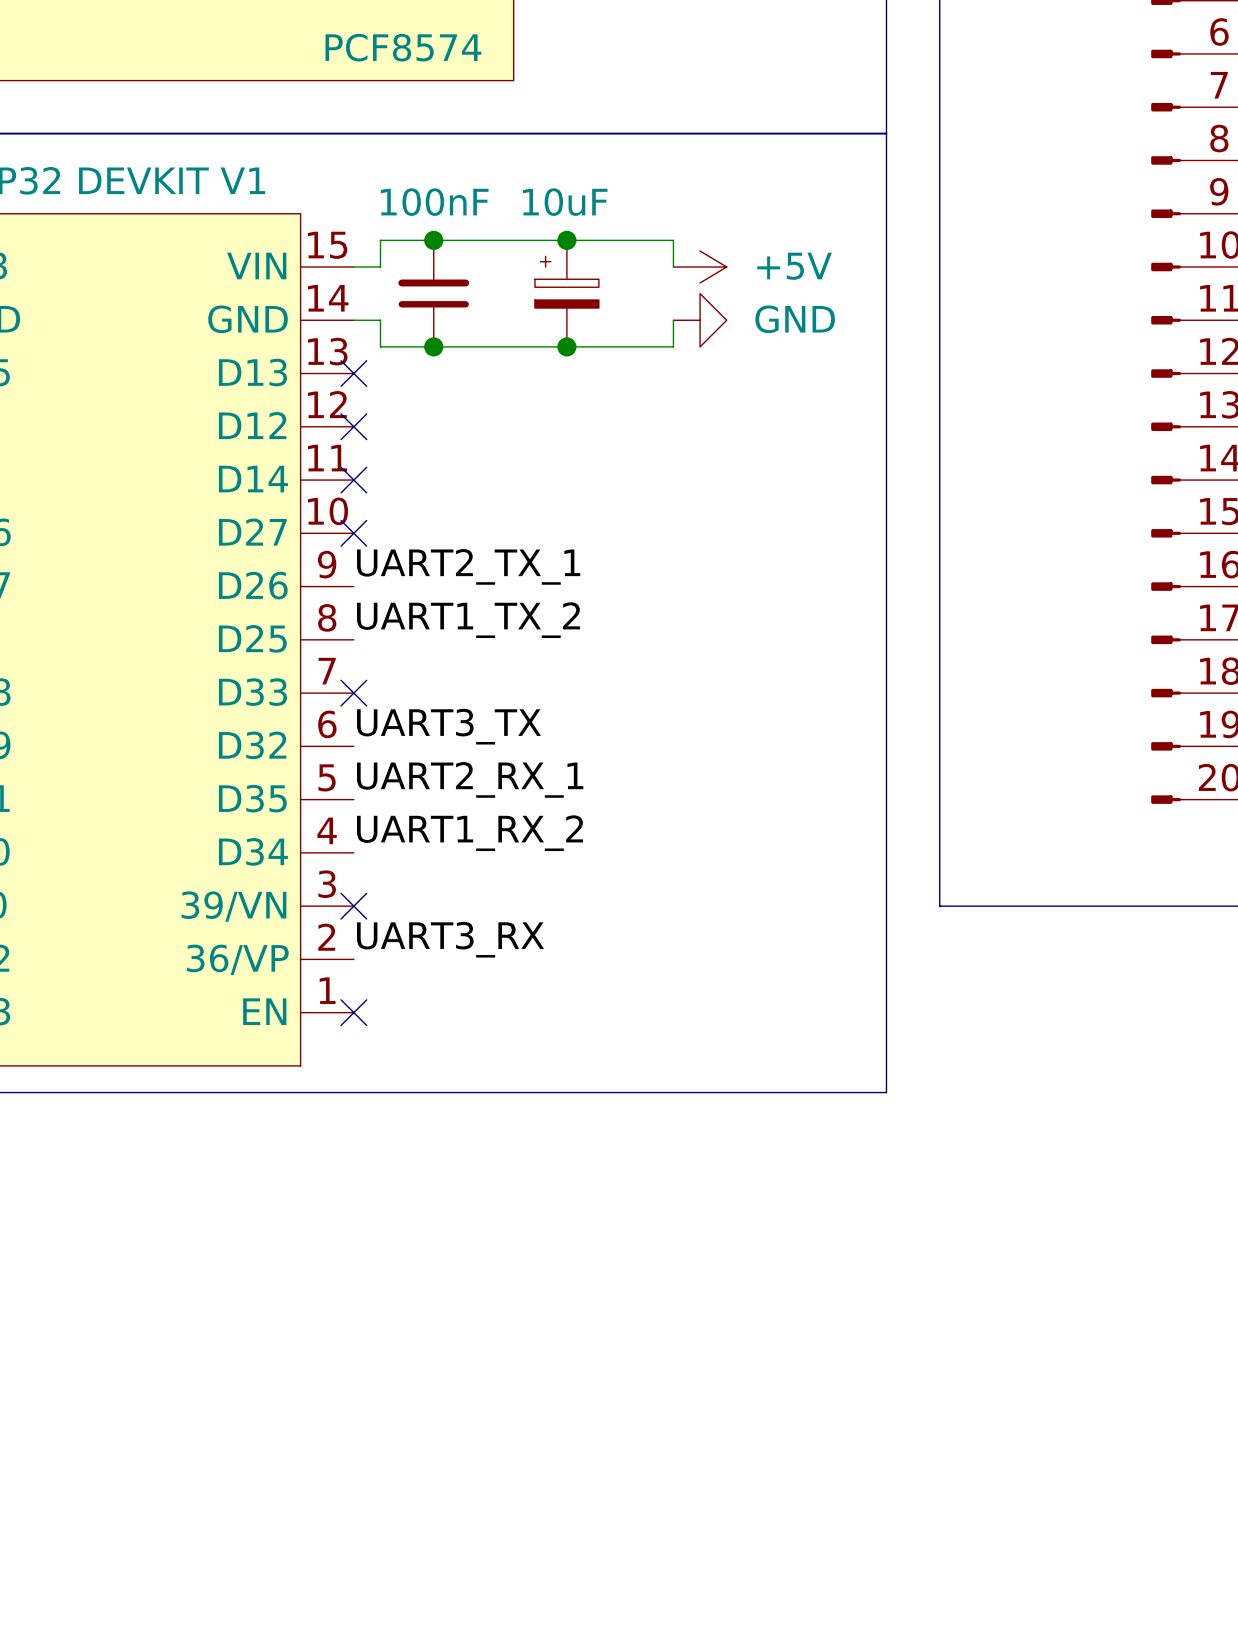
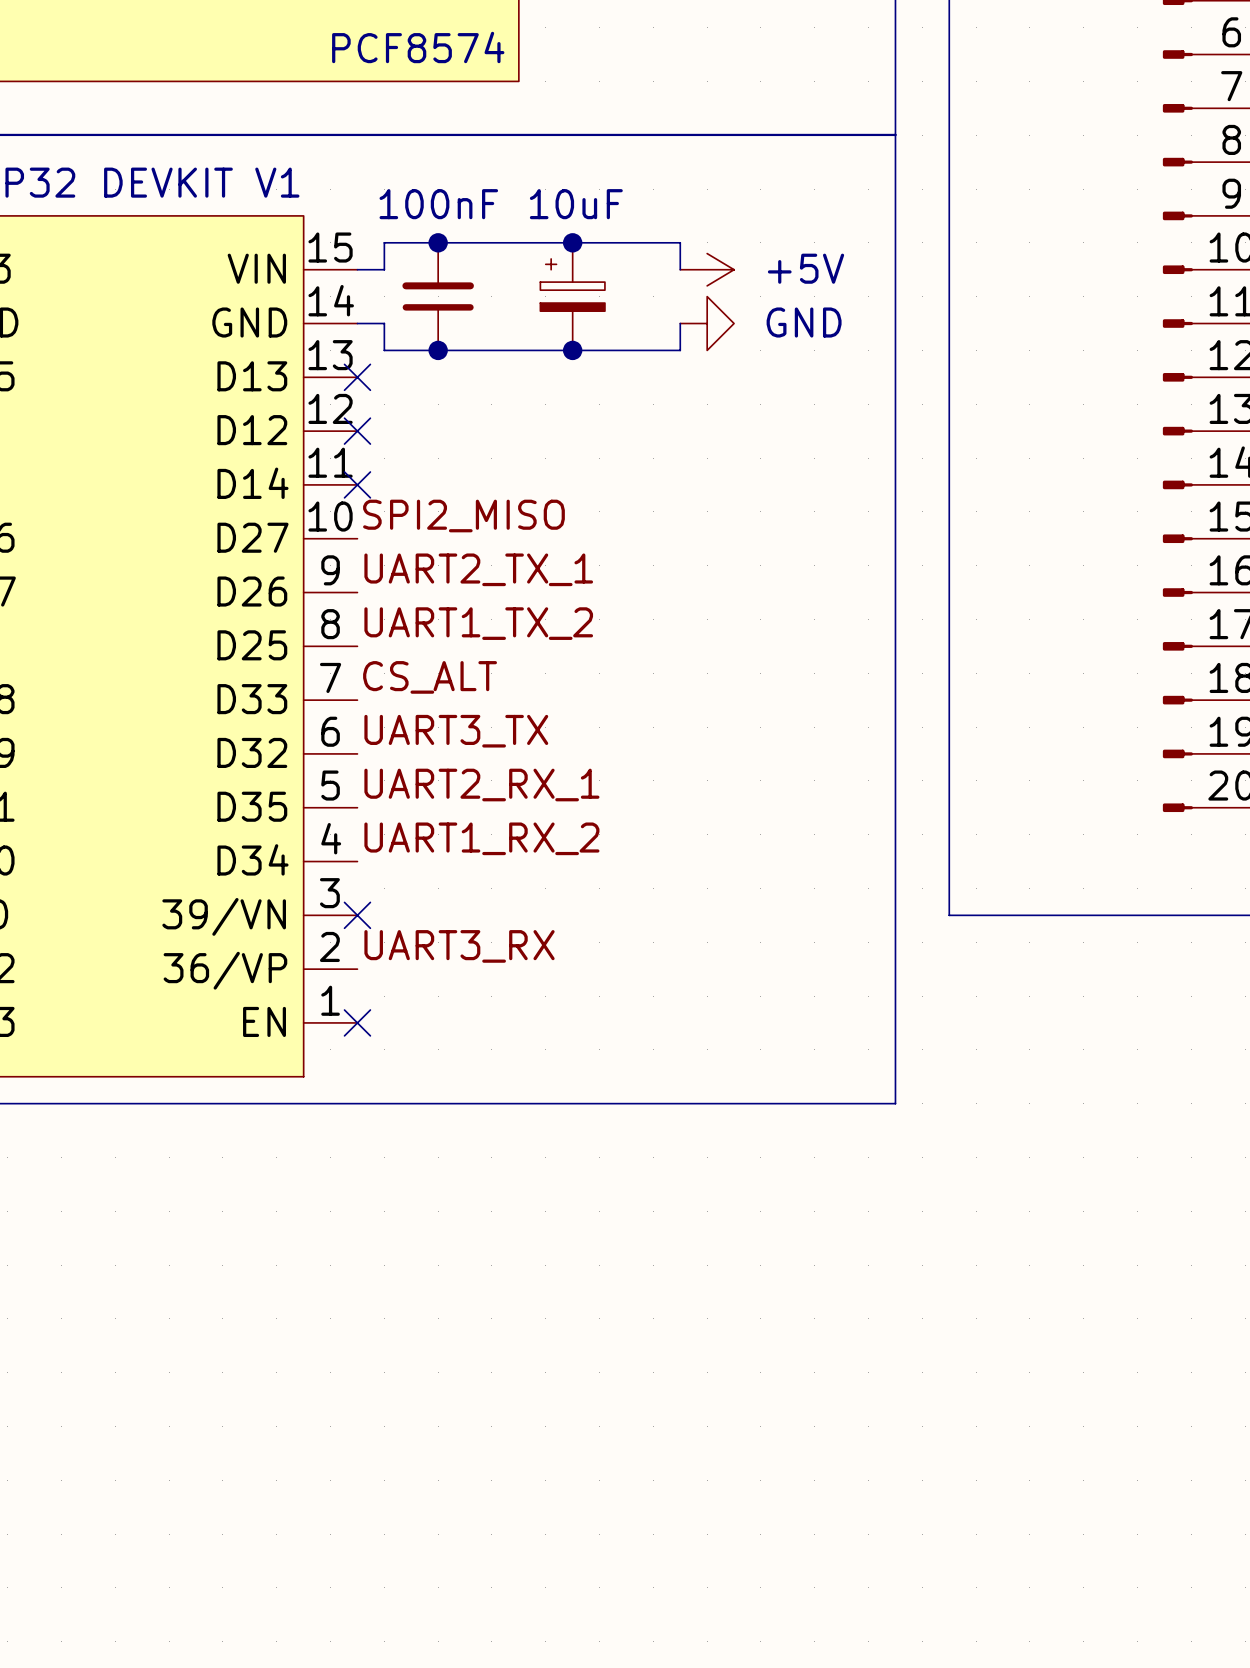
label: none -> SPI2_MISO (463, 516)
no-connect mark: (353, 533) -> none
label: none -> CS_ALT (430, 677)
no-connect mark: (353, 693) -> none

